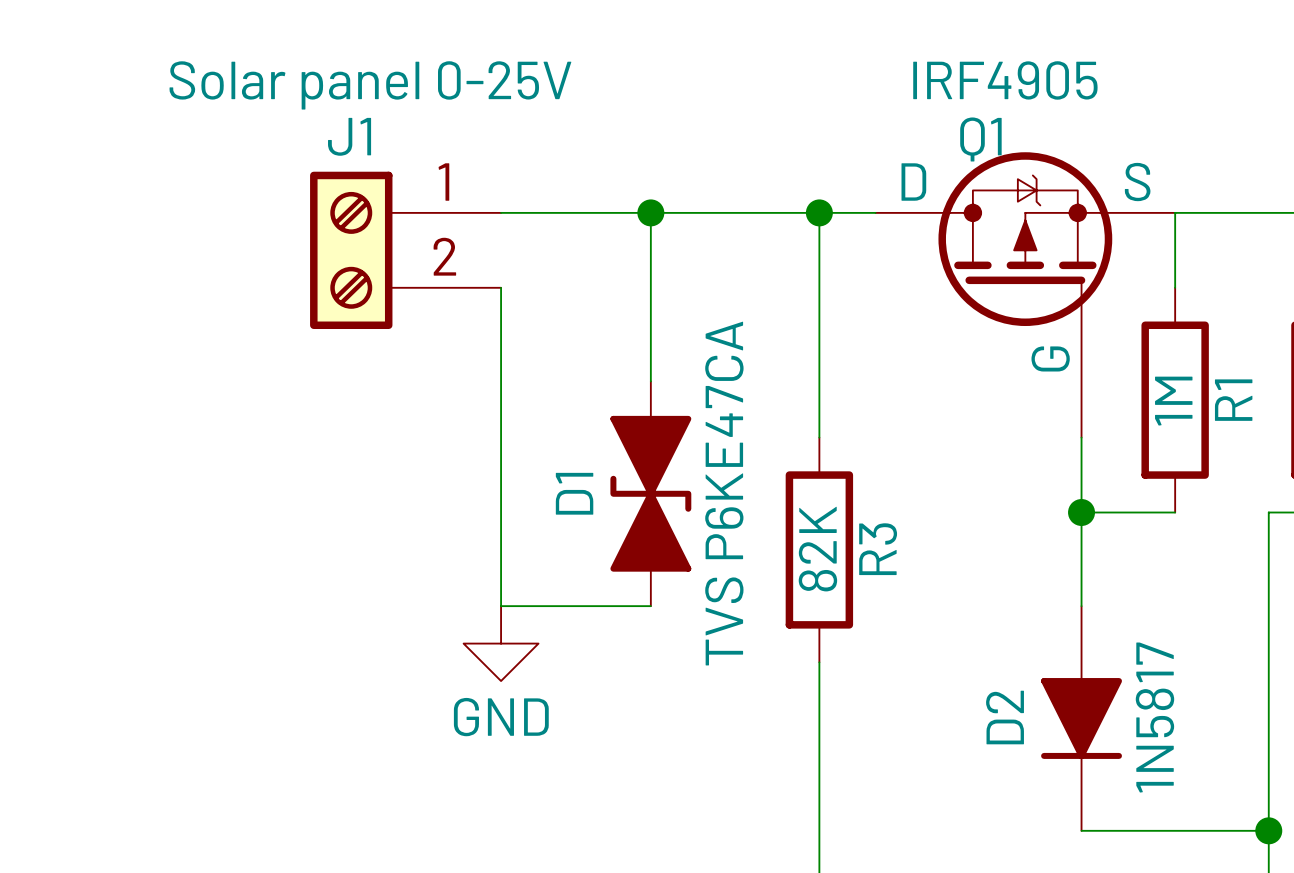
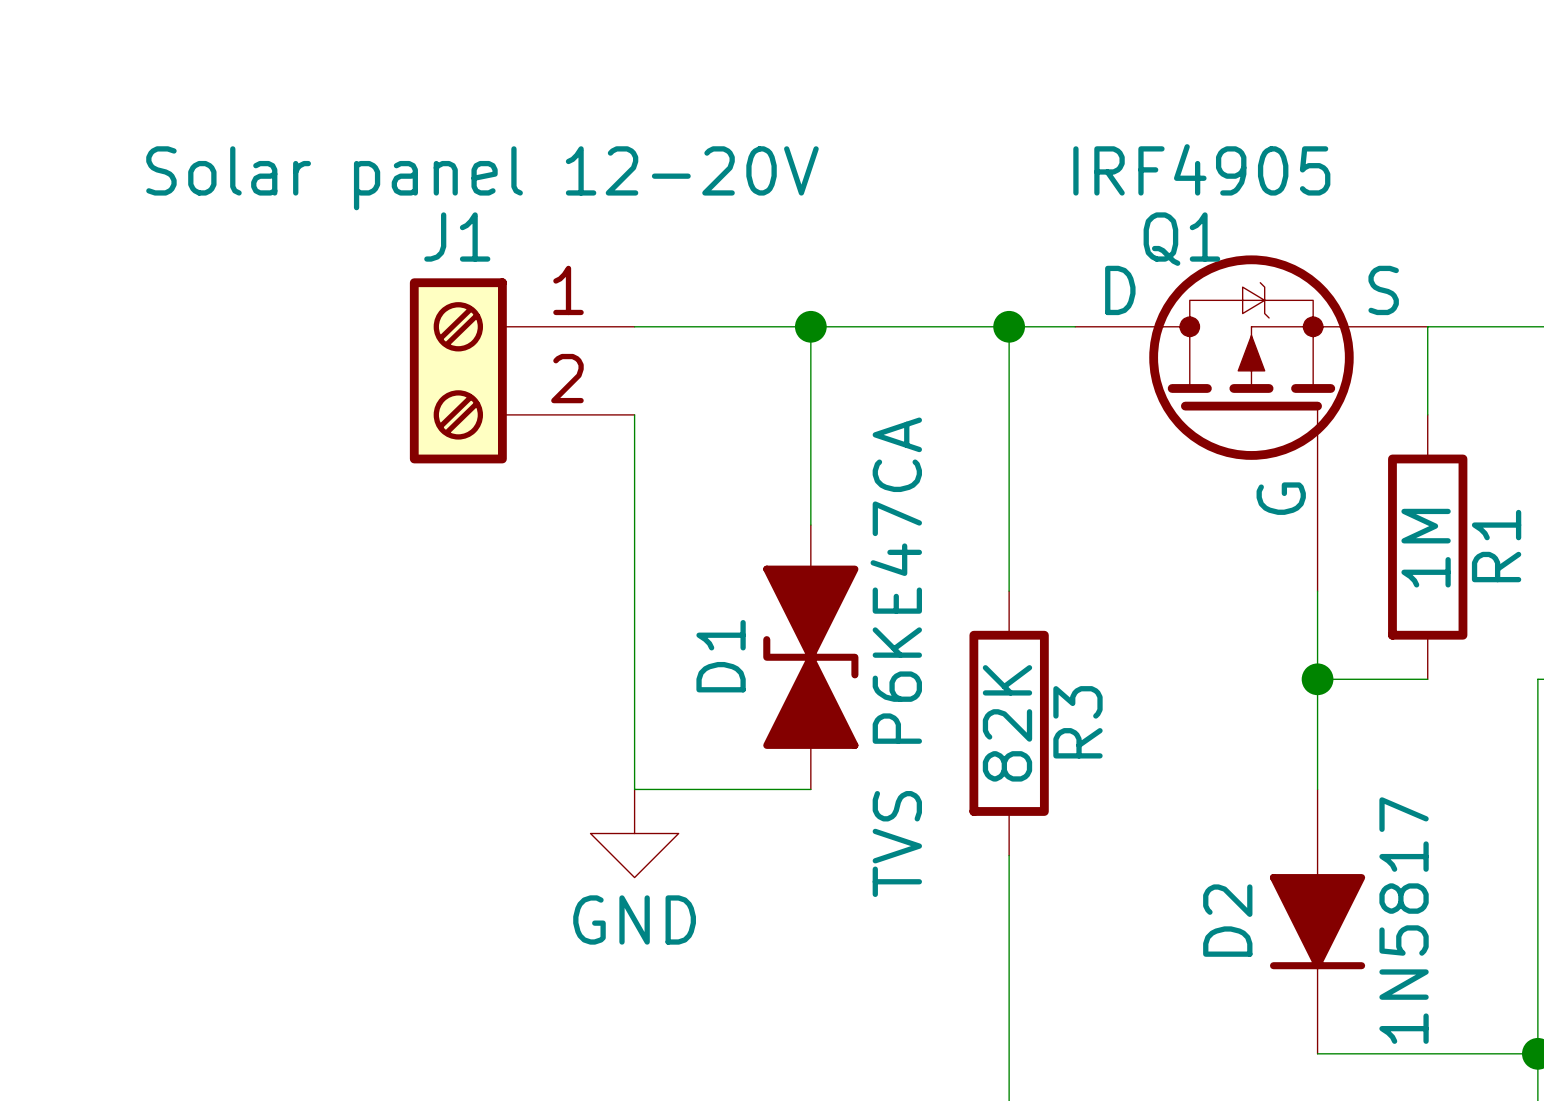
J1 value: Solar panel 0-25V (370, 85) -> Solar panel 12-20V (482, 178)

